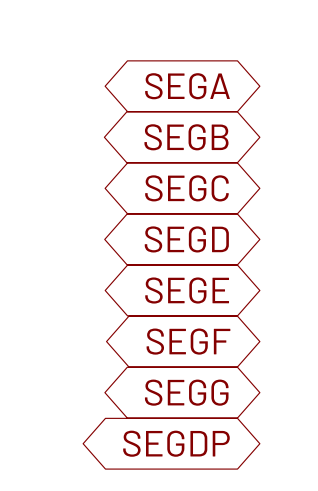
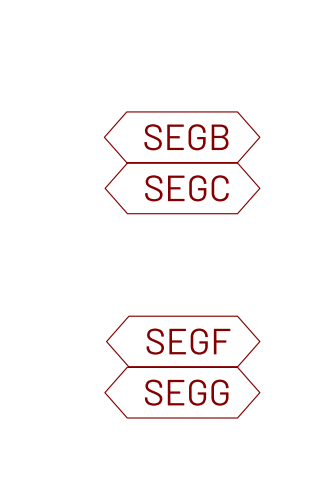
global label: SEGA (187, 86) -> none
global label: SEGD (186, 239) -> none
global label: SEGE (187, 290) -> none
global label: SEGDP (176, 443) -> none

